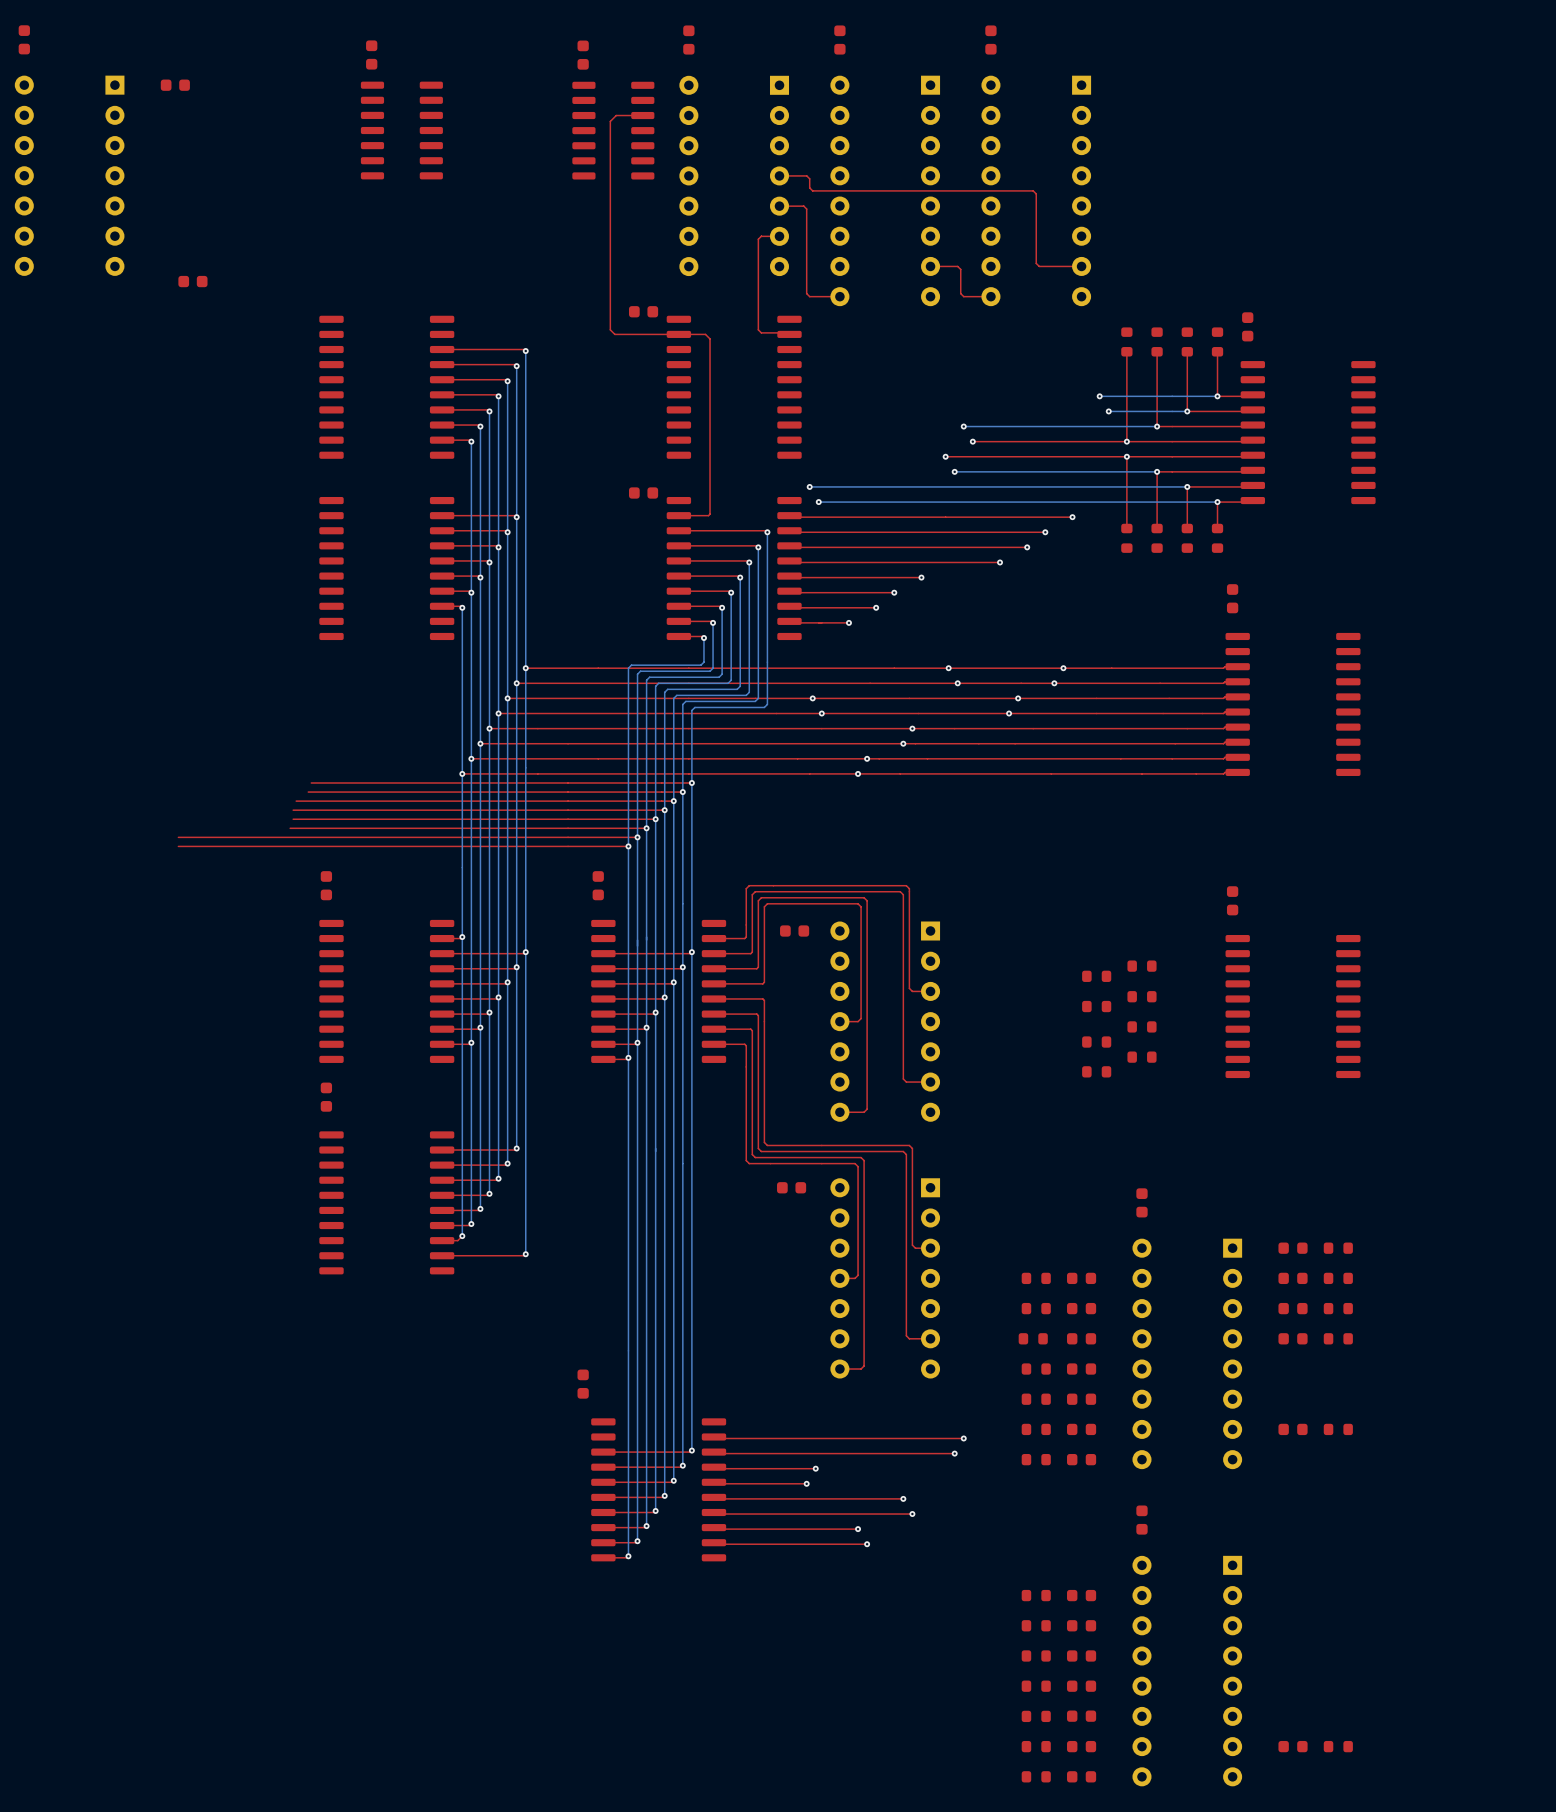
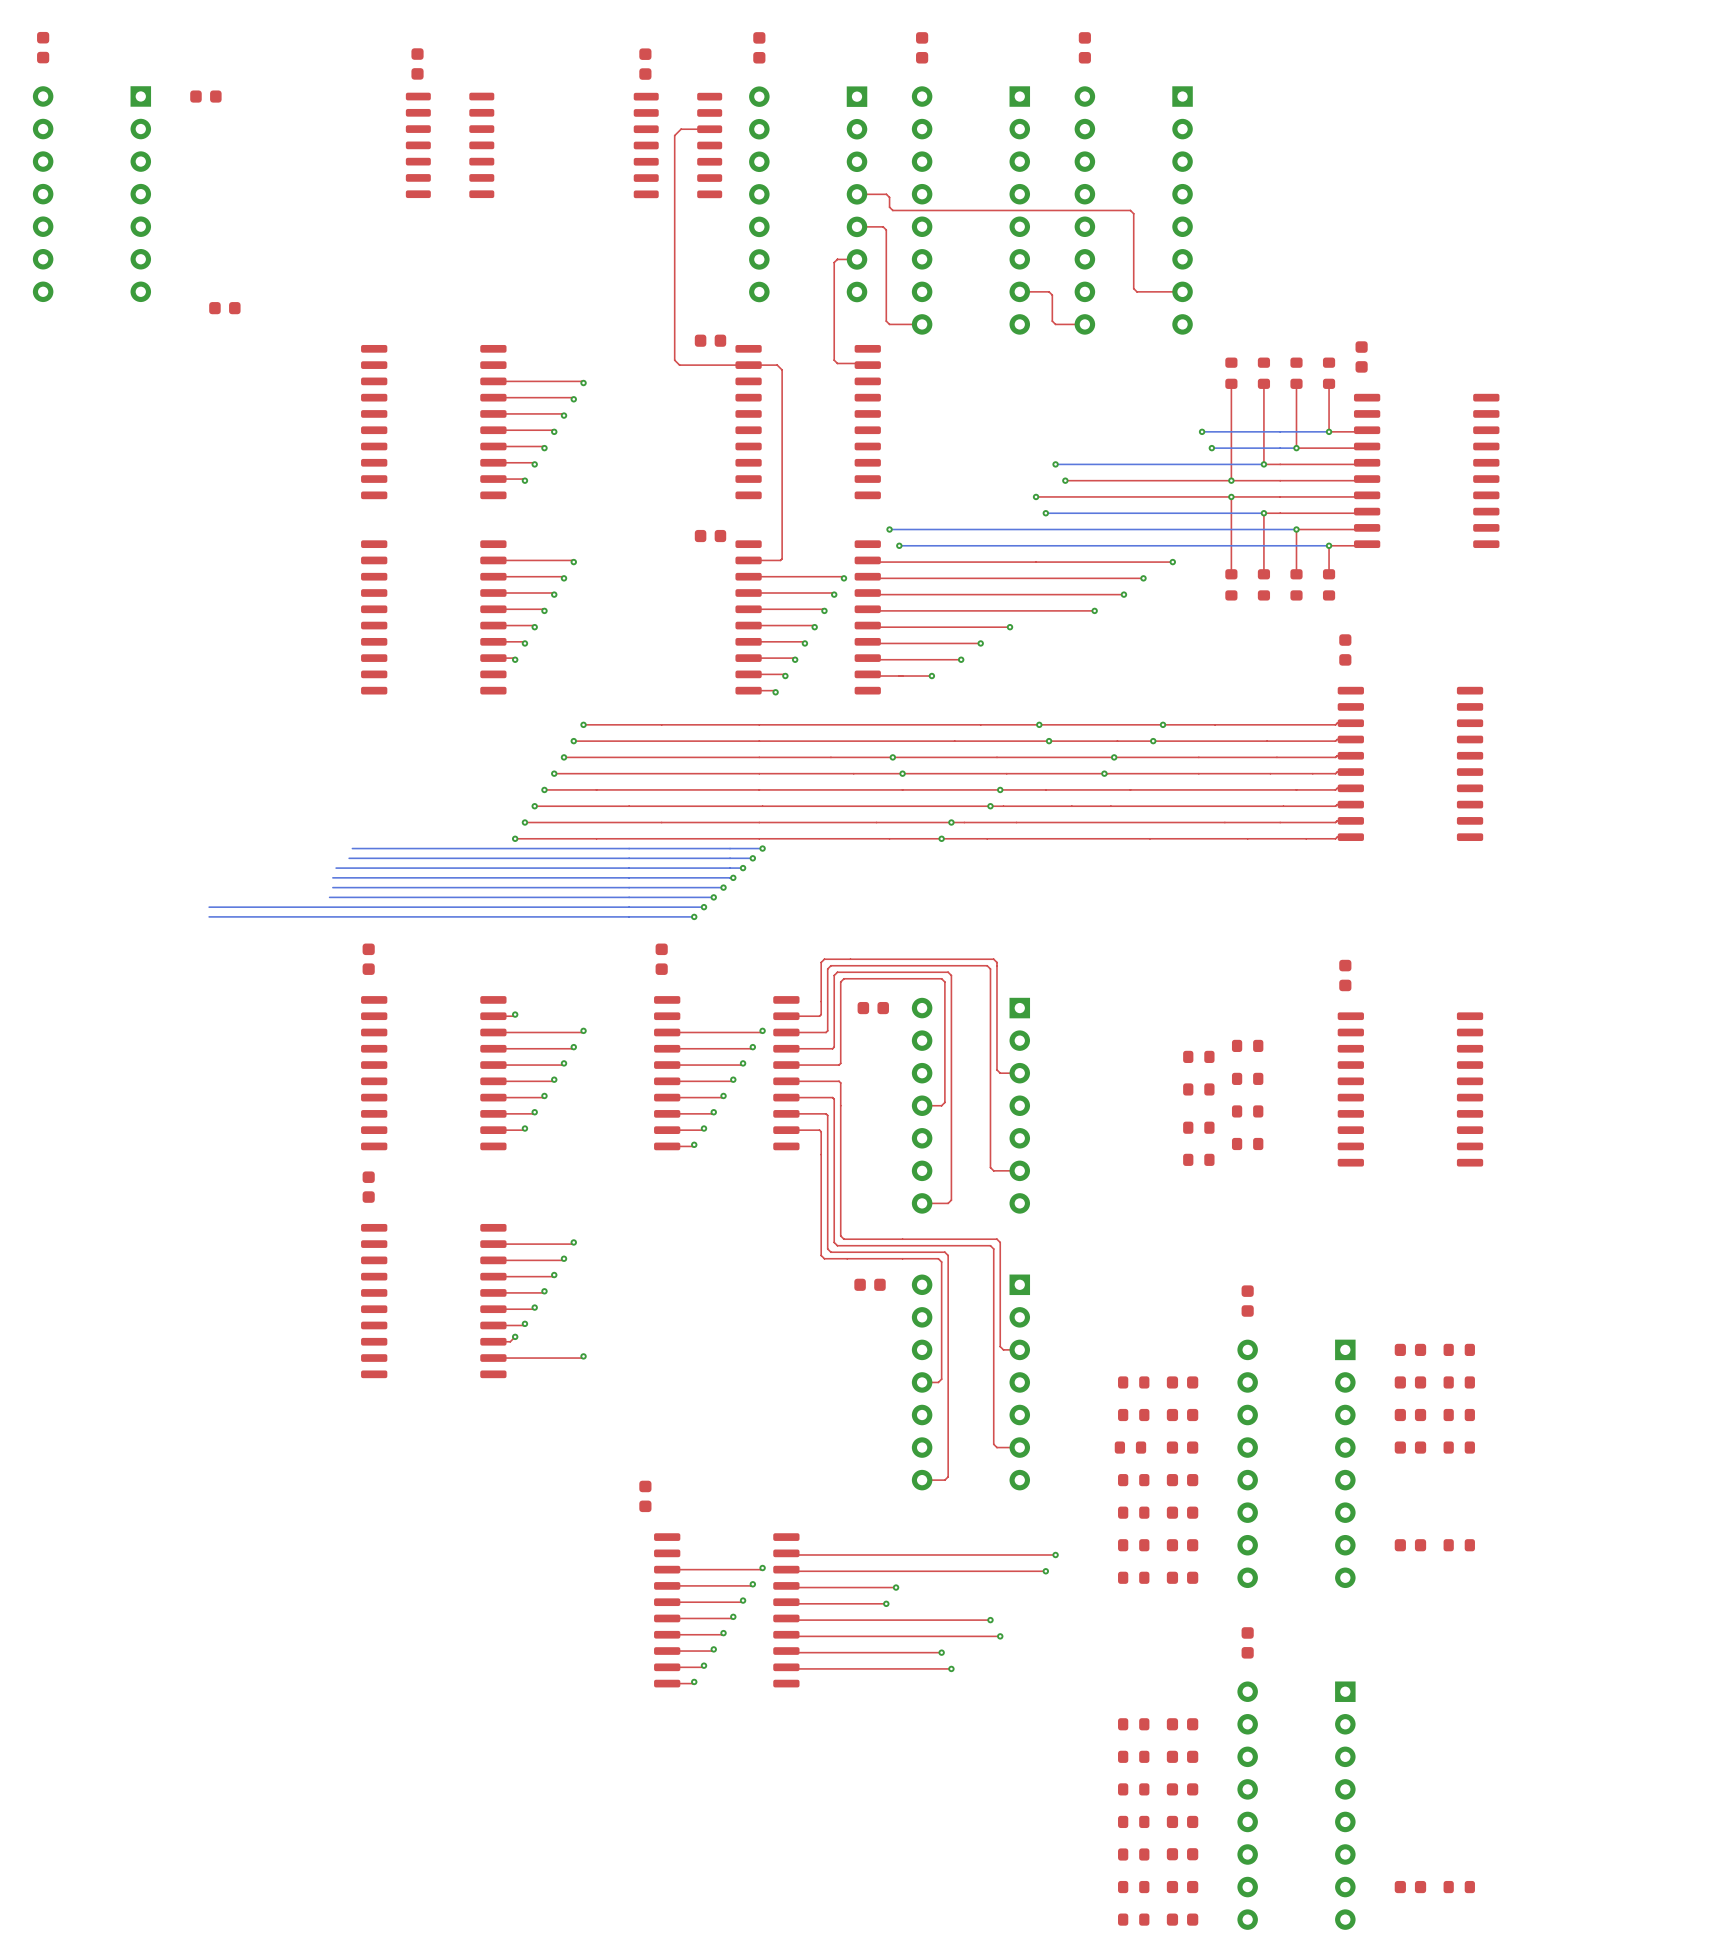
bottom track: (525, 351) (525, 1254) -> none
bottom track: (516, 366) (516, 1148) -> none
bottom track: (507, 381) (507, 1163) -> none
bottom track: (498, 396) (498, 1178) -> none
bottom track: (489, 411) (489, 1193) -> none
bottom track: (480, 426) (480, 1208) -> none
bottom track: (471, 441) (471, 1224) -> none
bottom track: (767, 532) (767, 704) (764, 707) (694, 707) (691, 710) (691, 1450) -> none
bottom track: (758, 547) (758, 698) (755, 701) (685, 701) (682, 704) (682, 1465) -> none
bottom track: (749, 562) (749, 692) (746, 695) (676, 695) (673, 698) (673, 1480) -> none
bottom track: (740, 577) (740, 686) (737, 689) (667, 689) (664, 692) (664, 1495) -> none
bottom track: (731, 592) (731, 680) (728, 683) (658, 683) (655, 686) (655, 1510) -> none
bottom track: (462, 607) (462, 1236) -> none
bottom track: (722, 607) (722, 674) (719, 677) (649, 677) (646, 680) (646, 1526) -> none
bottom track: (713, 622) (713, 668) (710, 671) (640, 671) (637, 674) (637, 1541) -> none
bottom track: (703, 637) (703, 662) (700, 665) (631, 665) (628, 668) (628, 1556) -> none
top track: (691, 782) (311, 782) -> none
bottom track: none -> (762, 848) (352, 848)
top track: (682, 792) (308, 792) -> none
bottom track: none -> (752, 858) (349, 858)
top track: (673, 801) (296, 801) -> none
bottom track: none -> (743, 868) (336, 868)
top track: (664, 810) (293, 810) -> none
bottom track: none -> (733, 877) (332, 877)
top track: (655, 819) (293, 819) -> none
bottom track: none -> (723, 887) (332, 887)
top track: (646, 828) (290, 828) -> none
bottom track: none -> (713, 897) (329, 897)
top track: (637, 837) (178, 837) -> none
bottom track: none -> (703, 907) (209, 907)
top track: (628, 846) (178, 846) -> none
bottom track: none -> (694, 916) (209, 916)

